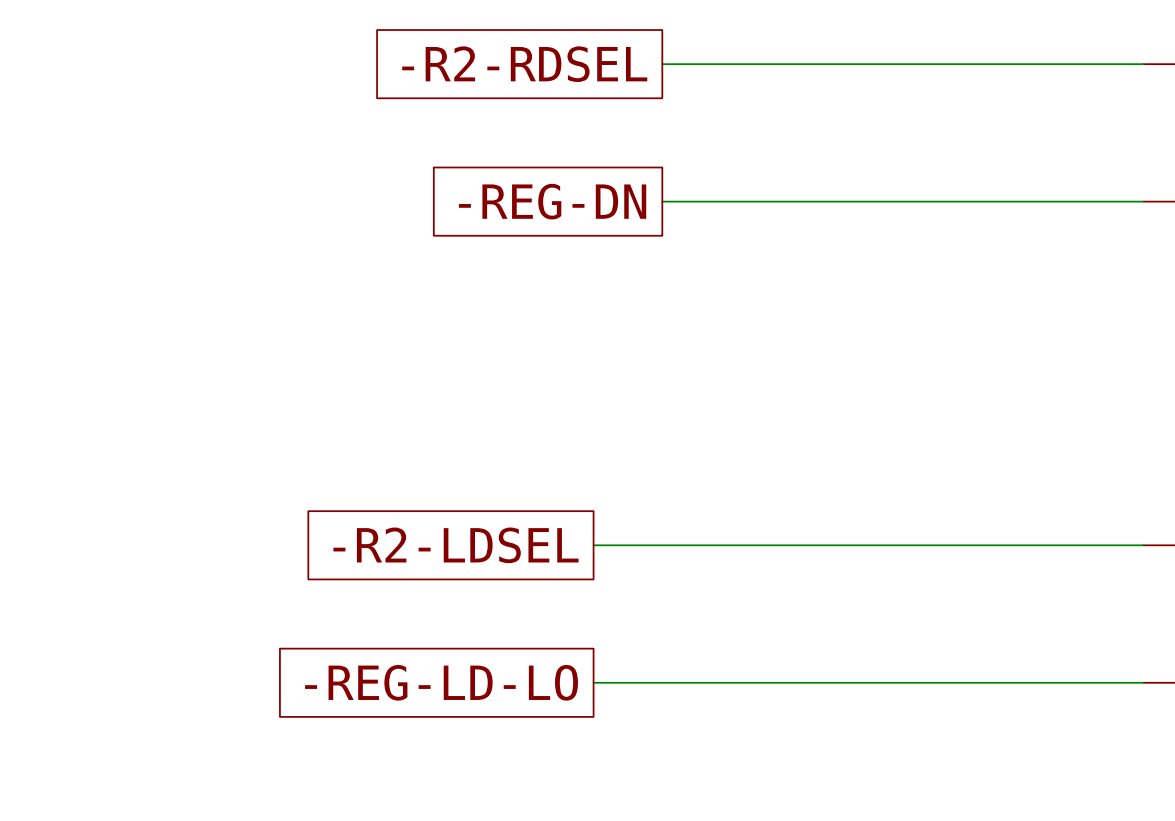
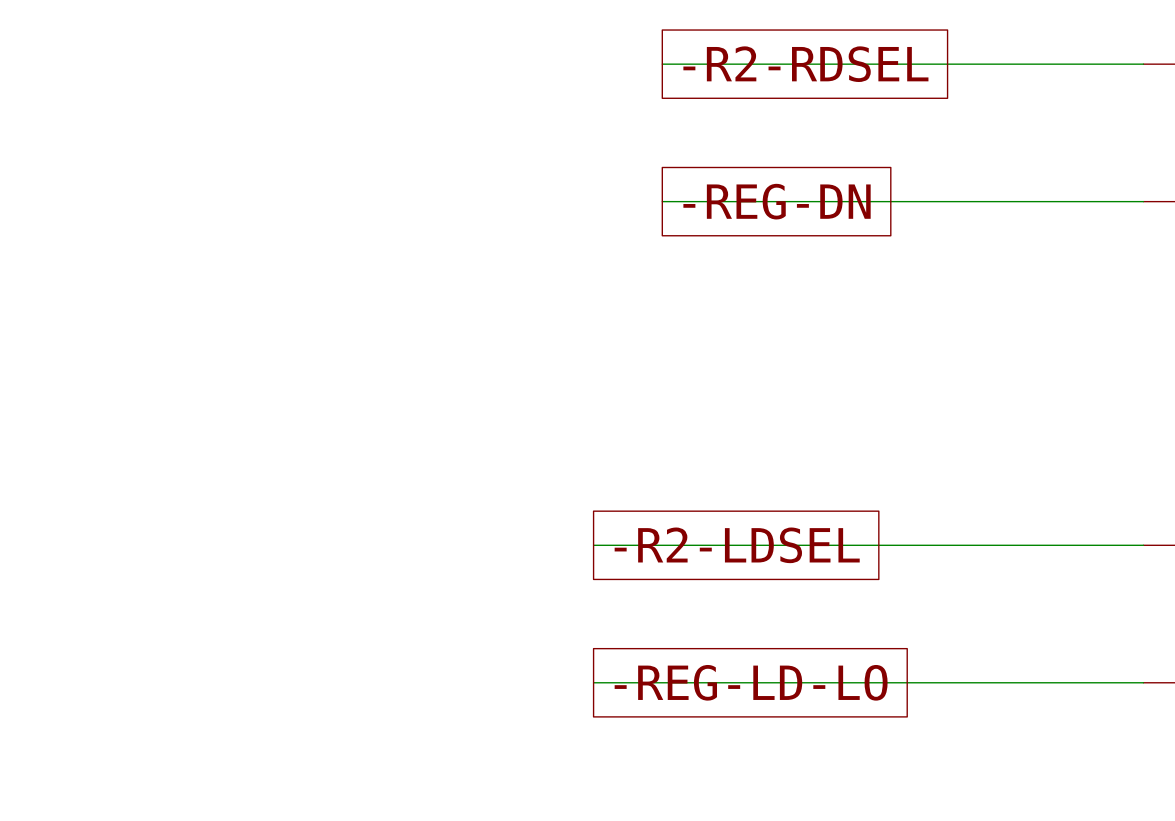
global label rotation: 0° (524, 64) -> 180° (805, 64)
global label position: -R2-RDSEL (524, 64) -> -R2-RDSEL (805, 64)
global label rotation: 0° (552, 201) -> 180° (777, 201)
global label rotation: 0° (455, 545) -> 180° (737, 545)
global label rotation: 0° (441, 682) -> 180° (751, 682)

